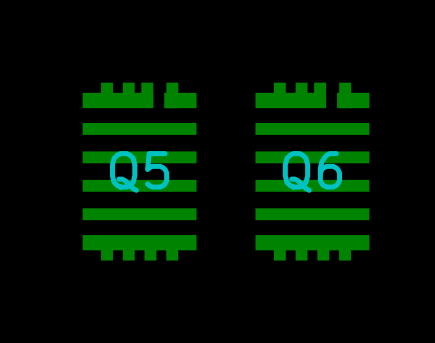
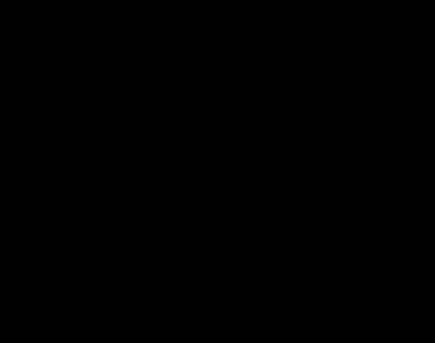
Q5: (139, 171) -> none
Q6: (312, 171) -> none

